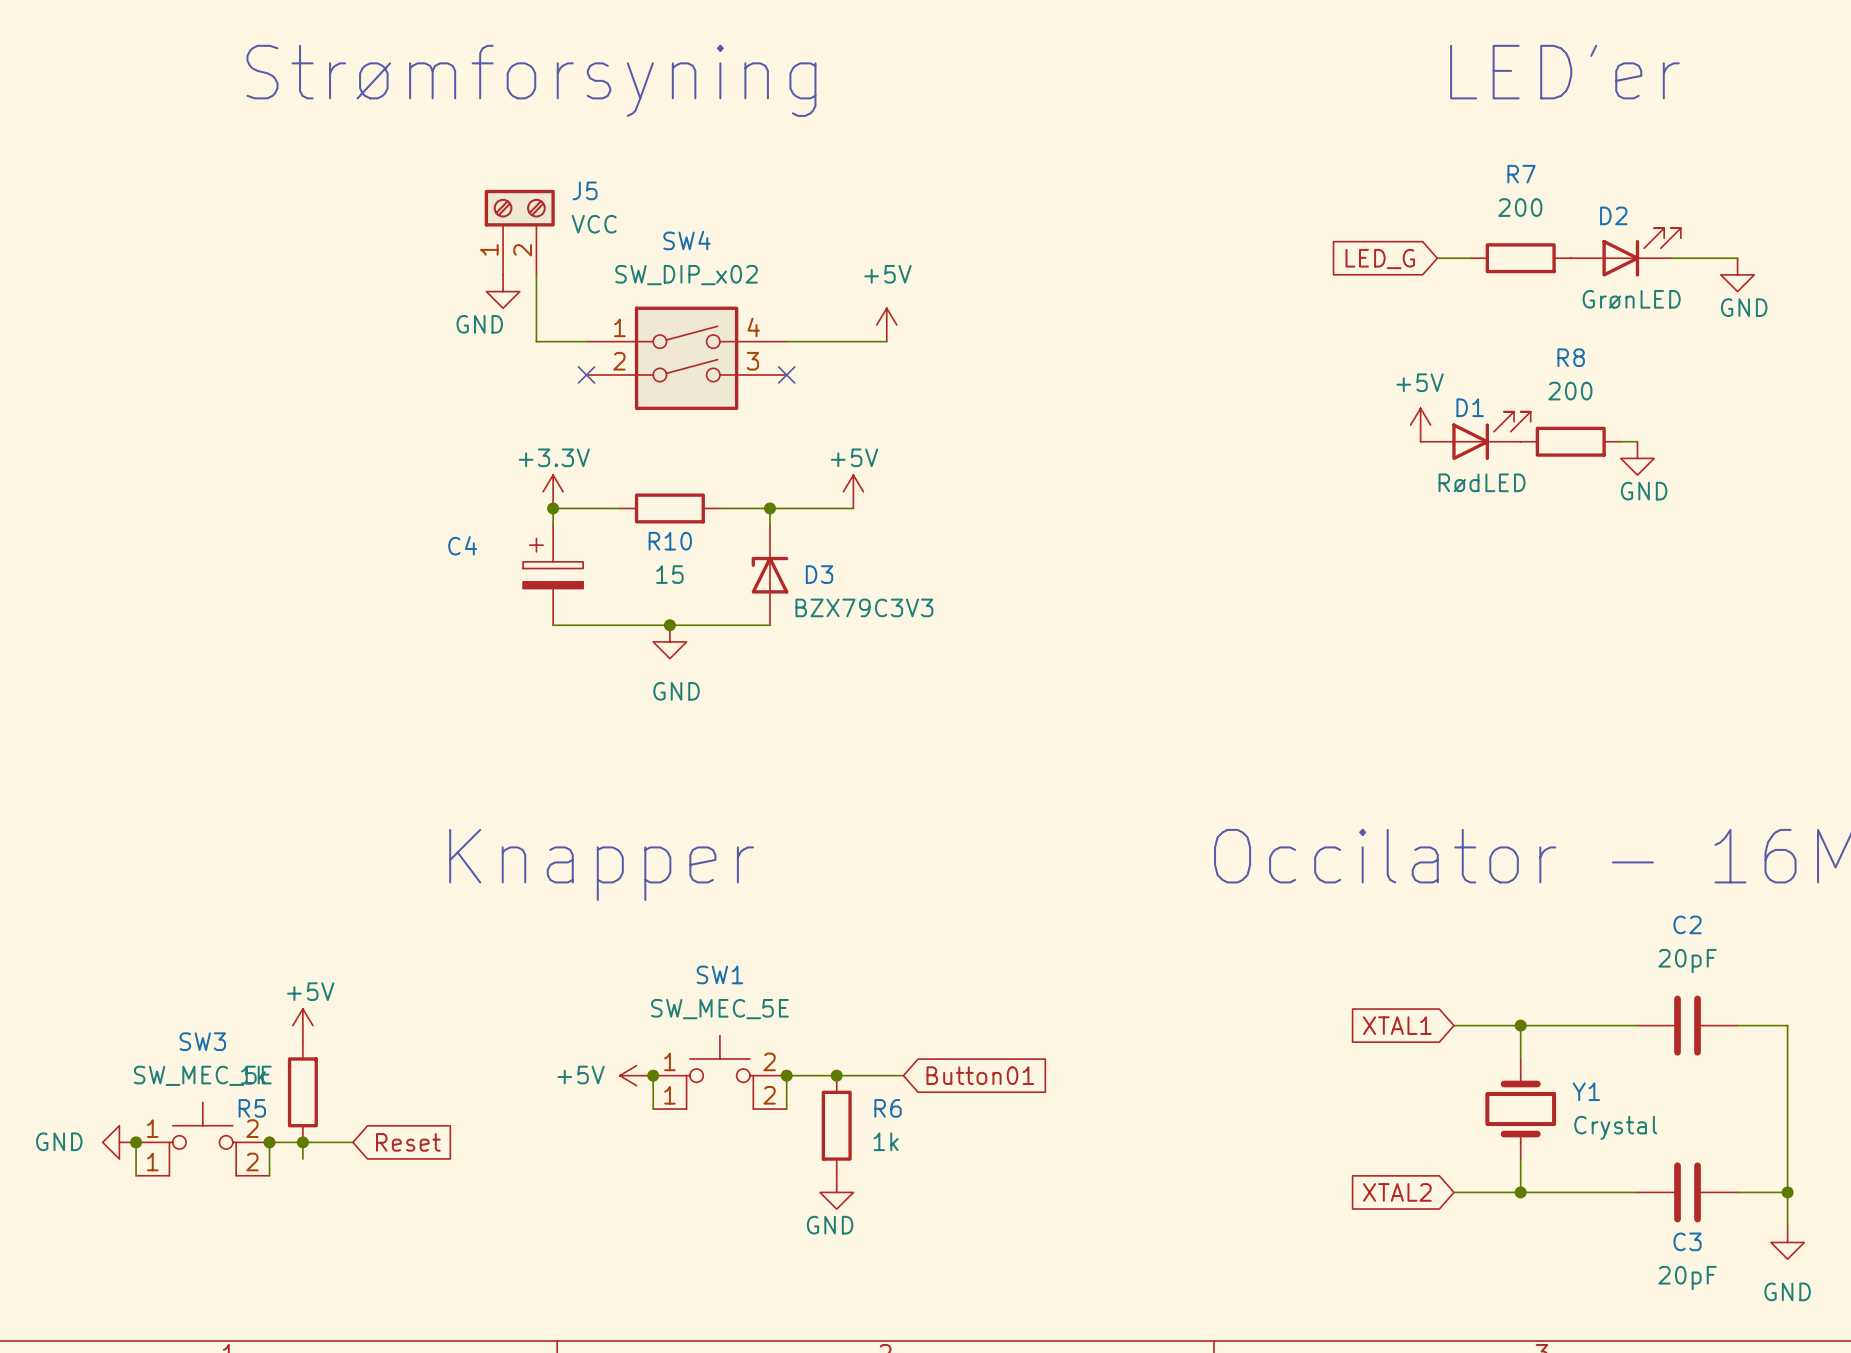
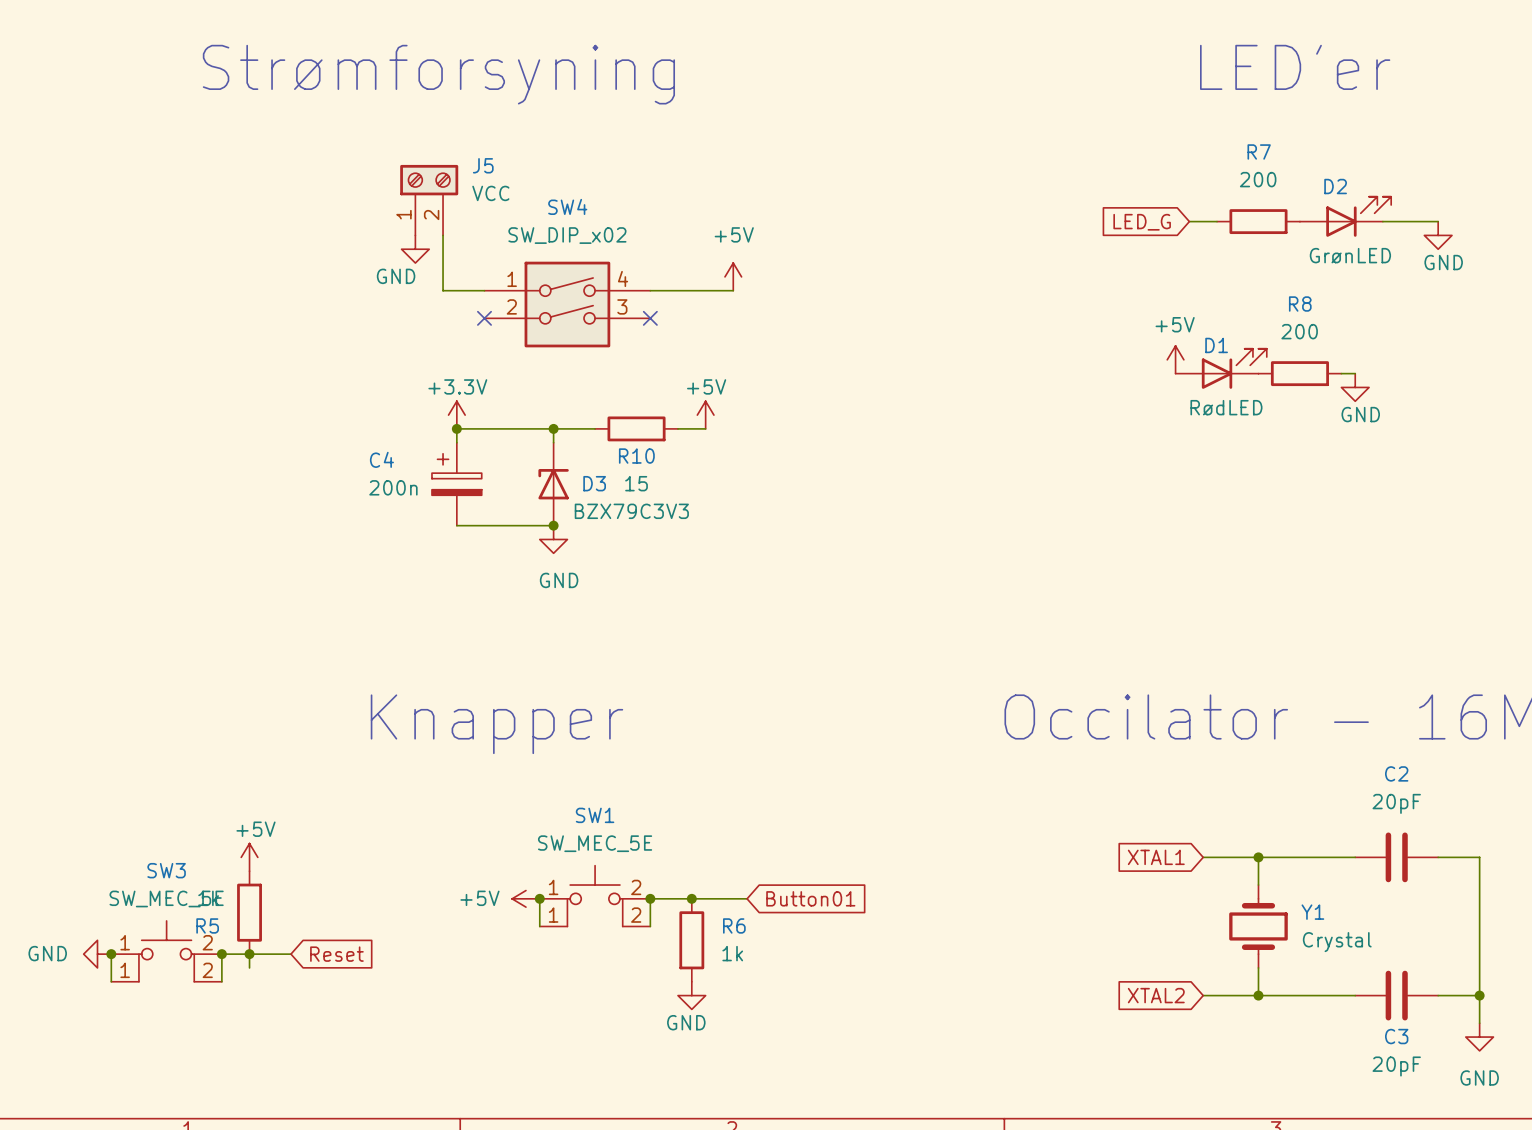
junction: none -> (553, 428)
R10 position: (669, 508) -> (636, 428)
wire: (719, 508) (820, 508) -> (595, 428) (512, 428)
wire: (769, 508) (769, 525) -> (553, 428) (553, 442)
junction: (769, 508) -> none
D3 position: (769, 575) -> (553, 484)
C4 value: none -> 200n (393, 487)
wire: (669, 625) (769, 625) -> none

